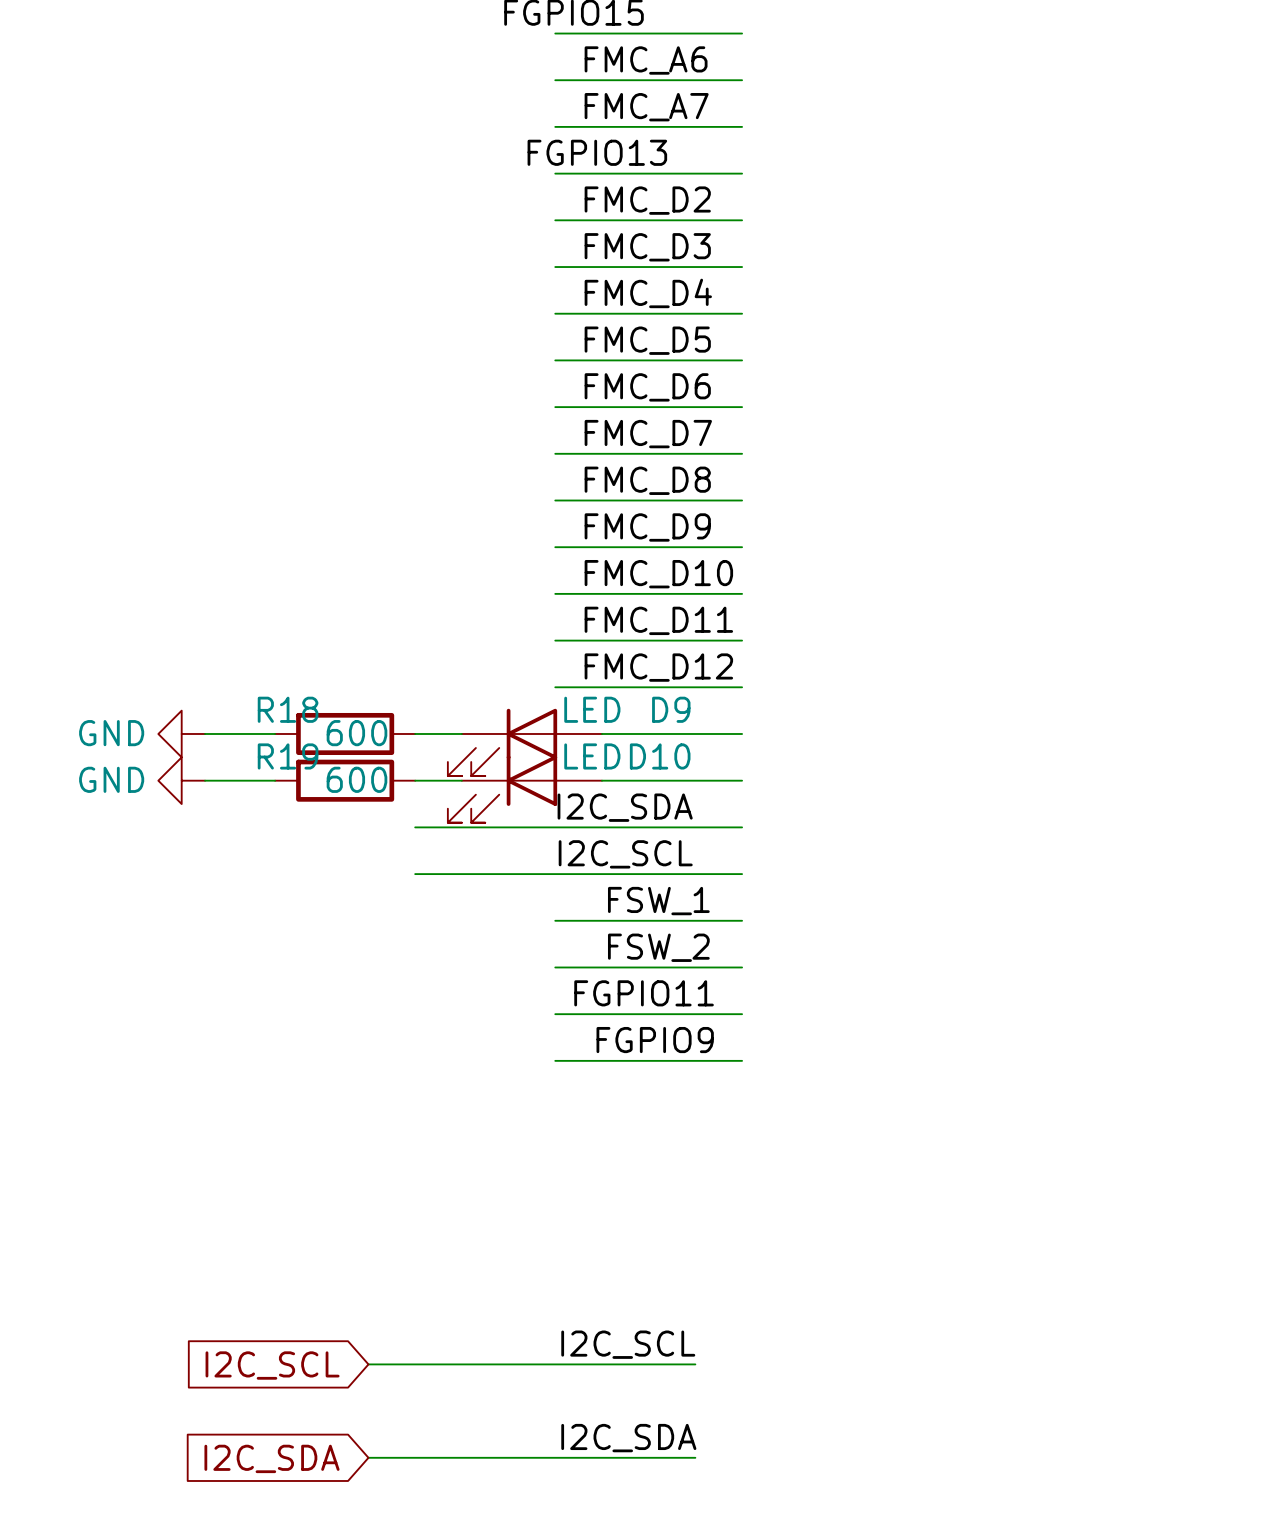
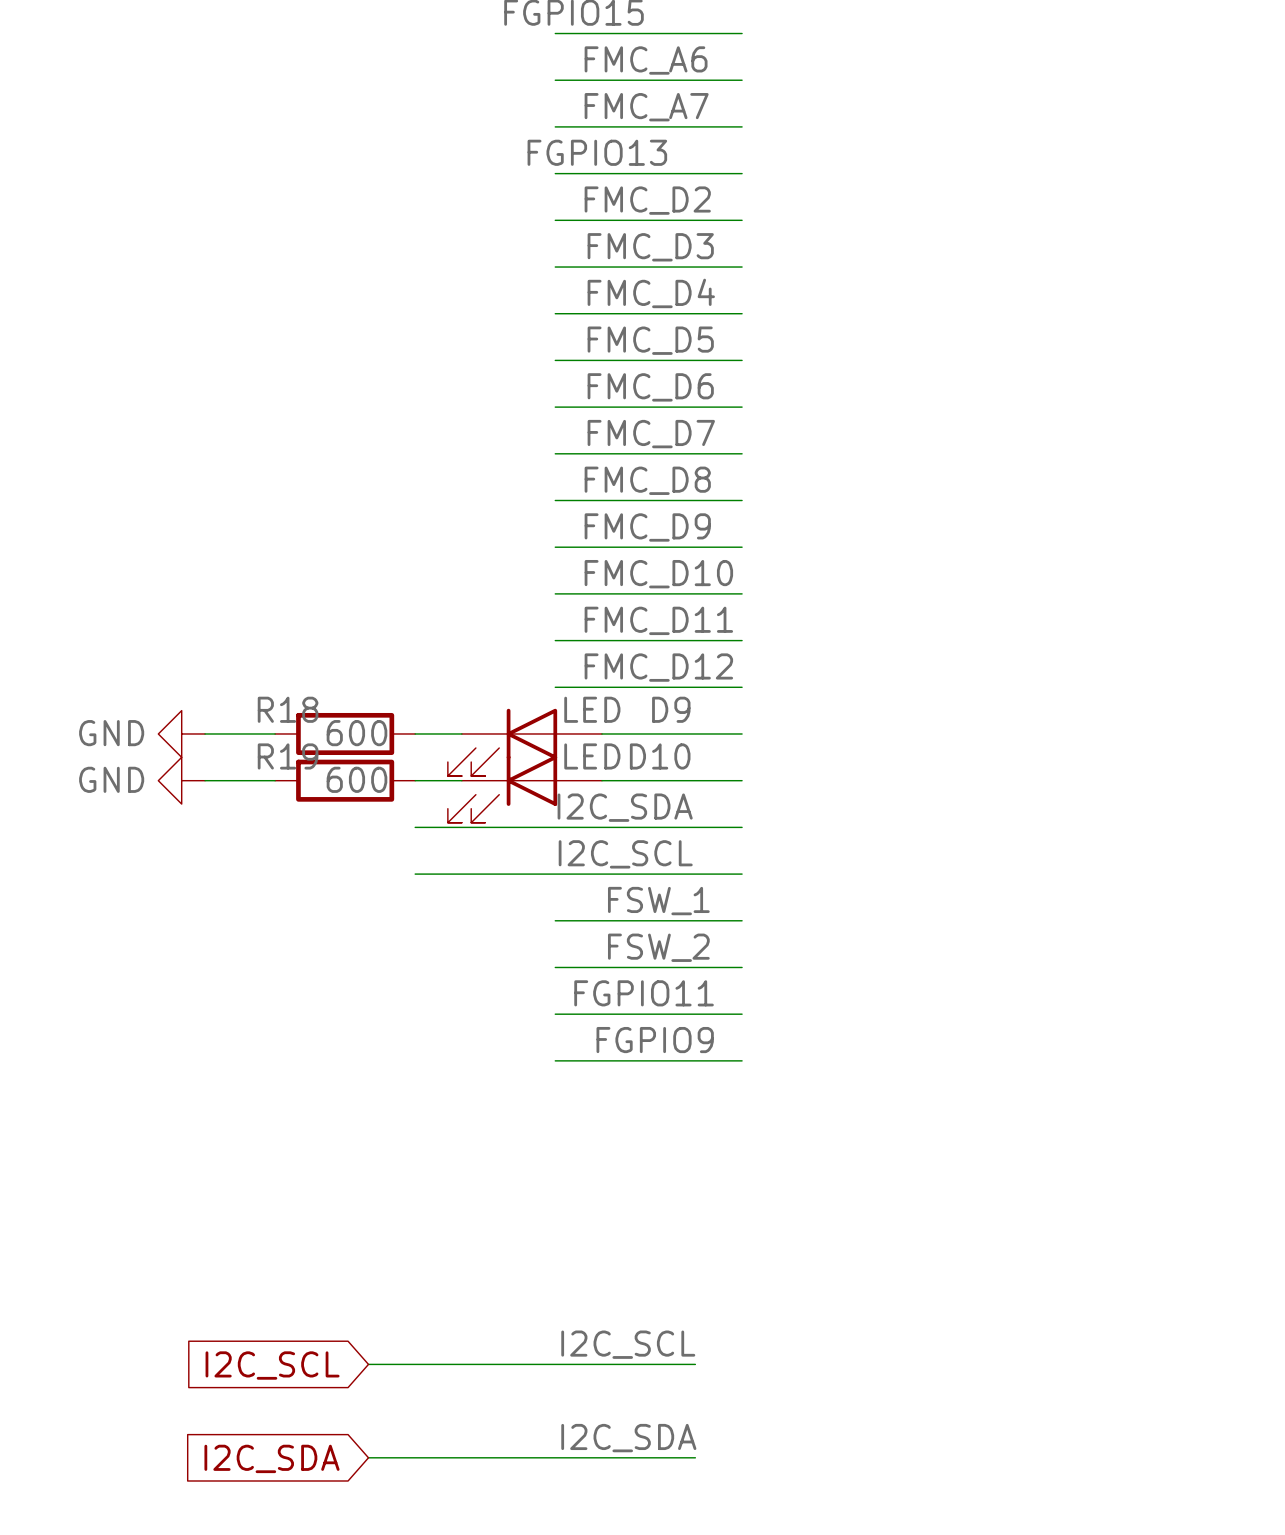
label position: FMC_D3 (647, 247) -> FMC_D3 (650, 247)
label position: FMC_D4 (648, 293) -> FMC_D4 (651, 293)
label position: FMC_D5 (647, 340) -> FMC_D5 (650, 340)
label position: FMC_D6 (647, 387) -> FMC_D6 (650, 387)
label position: FMC_D7 (648, 434) -> FMC_D7 (651, 434)

